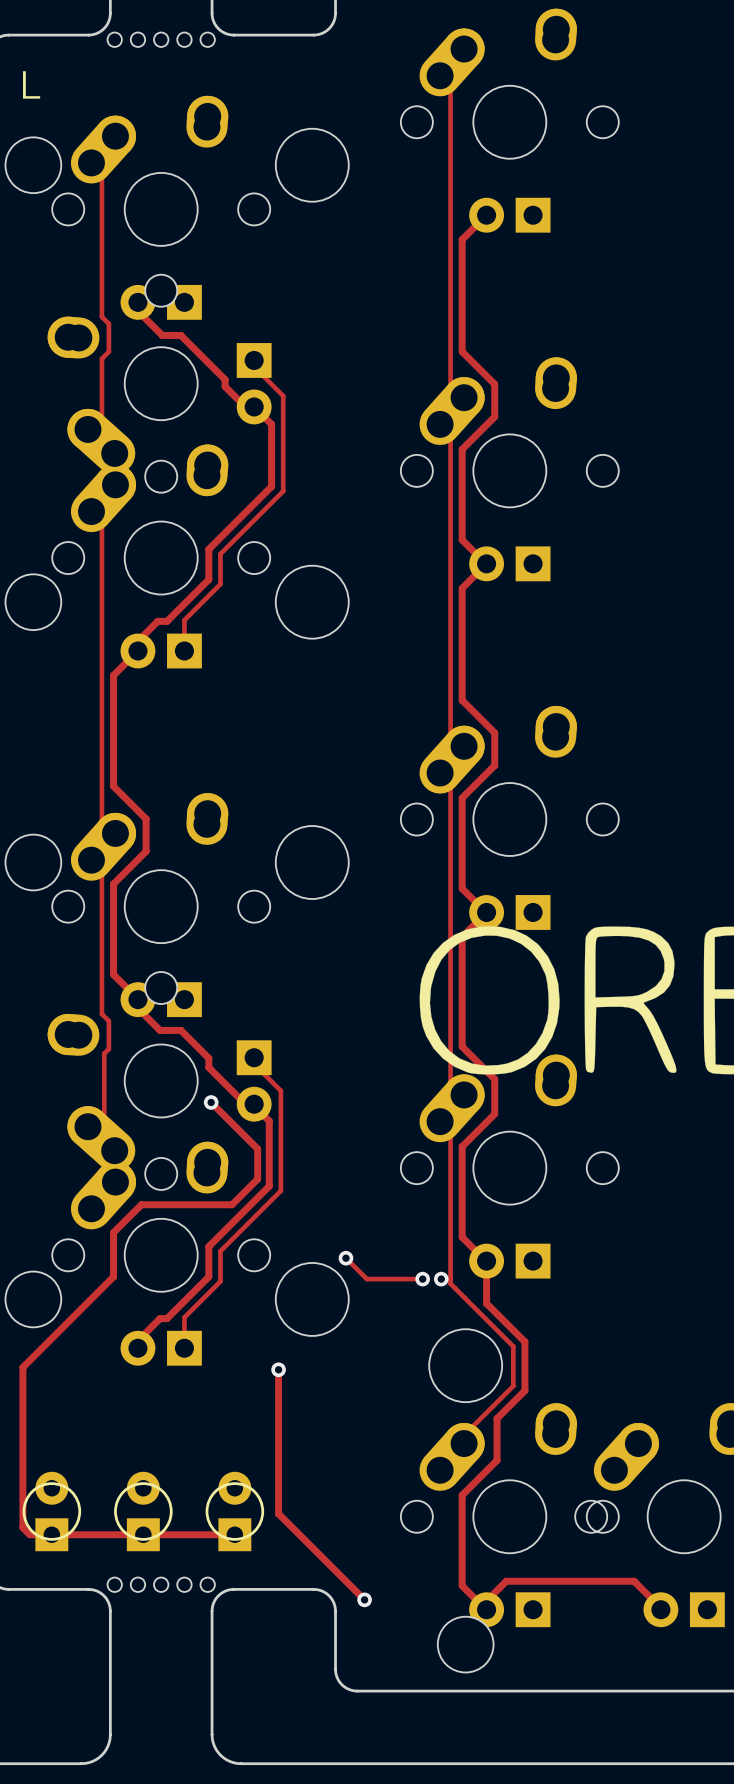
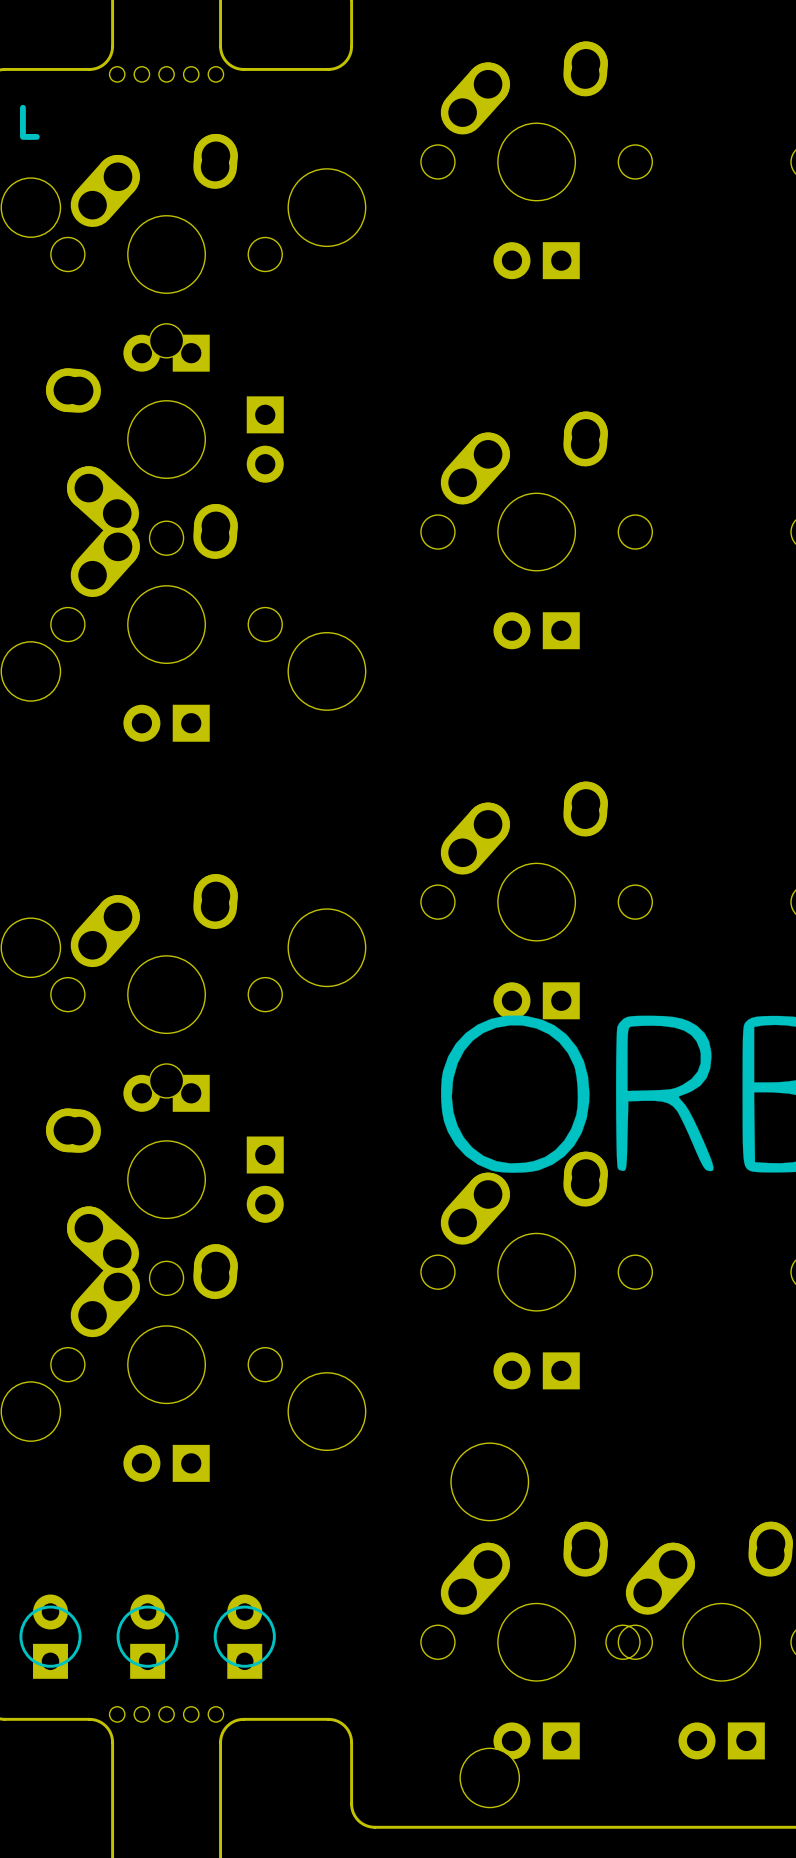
track: (440, 75) (450, 86) (450, 413) (440, 424) (450, 434) (450, 762) (440, 773) (450, 783) (450, 1111) (440, 1121) (450, 1132) (450, 1283) (513, 1346) (513, 1386) (440, 1459) (440, 1470) -> none
track: (91, 162) (101, 173) (101, 316) (108, 323) (108, 351) (101, 358) (101, 440) (114, 453) (114, 488) (91, 511) (101, 522) (101, 849) (91, 860) (101, 870) (101, 1014) (108, 1021) (108, 1049) (104, 1053) (104, 1140) (114, 1150) (114, 1185) (91, 1208) -> none
track: (486, 215) (462, 239) (462, 351) (494, 384) (494, 416) (462, 449) (462, 540) (486, 563) (462, 588) (462, 700) (494, 732) (494, 765) (462, 798) (462, 888) (486, 912) (462, 936) (462, 1046) (494, 1079) (494, 1114) (462, 1146) (462, 1237) (486, 1261) (486, 1303) (524, 1341) (524, 1390) (497, 1418) (497, 1460) (462, 1495) (462, 1585) (486, 1609) (486, 1601) (506, 1581) (634, 1581) (660, 1609) -> none
track: (137, 302) (137, 311) (162, 335) (180, 335) (225, 379) (225, 386) (245, 406) (254, 406) (271, 424) (271, 486) (208, 549) (208, 579) (167, 621) (157, 621) (137, 641) (137, 651) (113, 675) (113, 786) (146, 818) (146, 851) (113, 884) (113, 974) (137, 999) (137, 1008) (160, 1030) (180, 1030) (208, 1058) (208, 1067) (245, 1104) (254, 1104) (269, 1121) (269, 1186) (208, 1246) (208, 1276) (167, 1318) (160, 1318) (137, 1340) (137, 1348) -> none
track: (254, 360) (254, 366) (283, 395) (283, 491) (220, 553) (220, 584) (184, 620) (184, 651) -> none
track: (254, 1057) (254, 1064) (280, 1090) (280, 1190) (220, 1251) (220, 1281) (184, 1317) (184, 1348) -> none
track: (211, 1102) (257, 1148) (257, 1179) (232, 1204) (141, 1204) (113, 1232) (113, 1276) (22, 1367) (22, 1527) (29, 1534) (234, 1534) -> none
via: (211, 1102) -> none
track: (345, 1258) (366, 1279) (422, 1279) -> none
via: (345, 1258) -> none
via: (422, 1279) -> none
via: (441, 1279) -> none
track: (278, 1369) (278, 1513) (364, 1599) -> none
via: (278, 1369) -> none
via: (364, 1599) -> none

